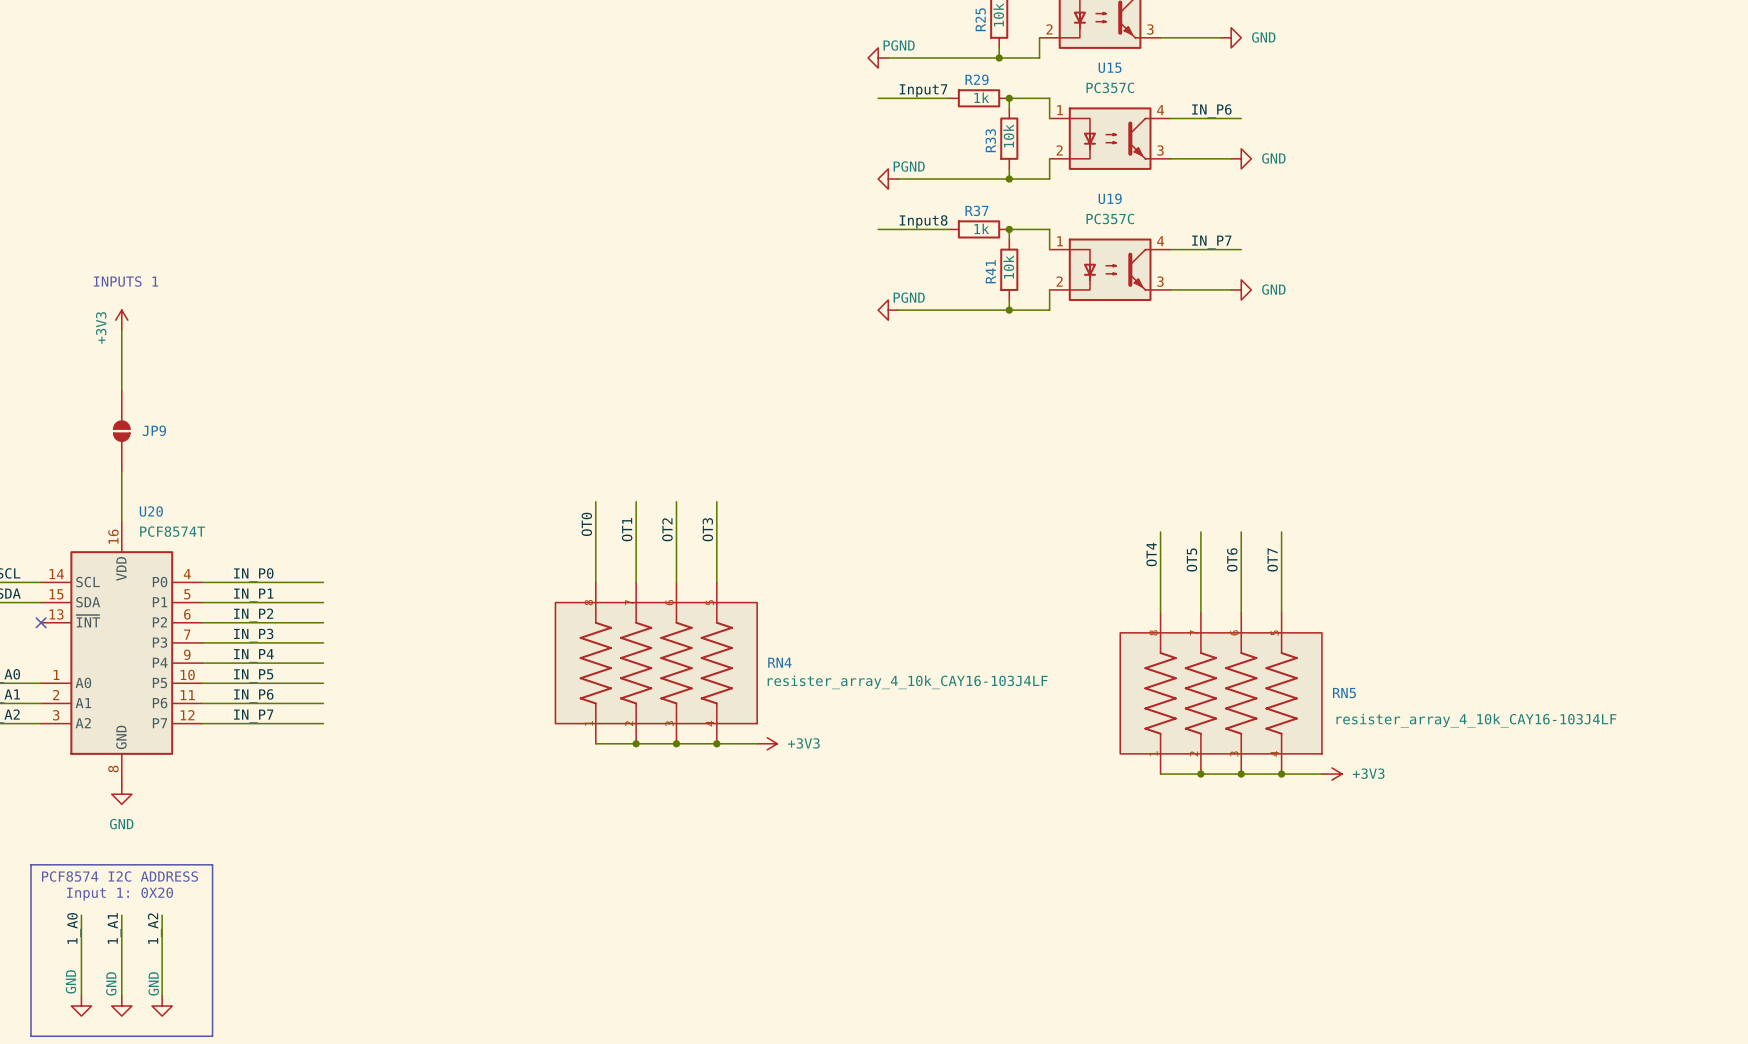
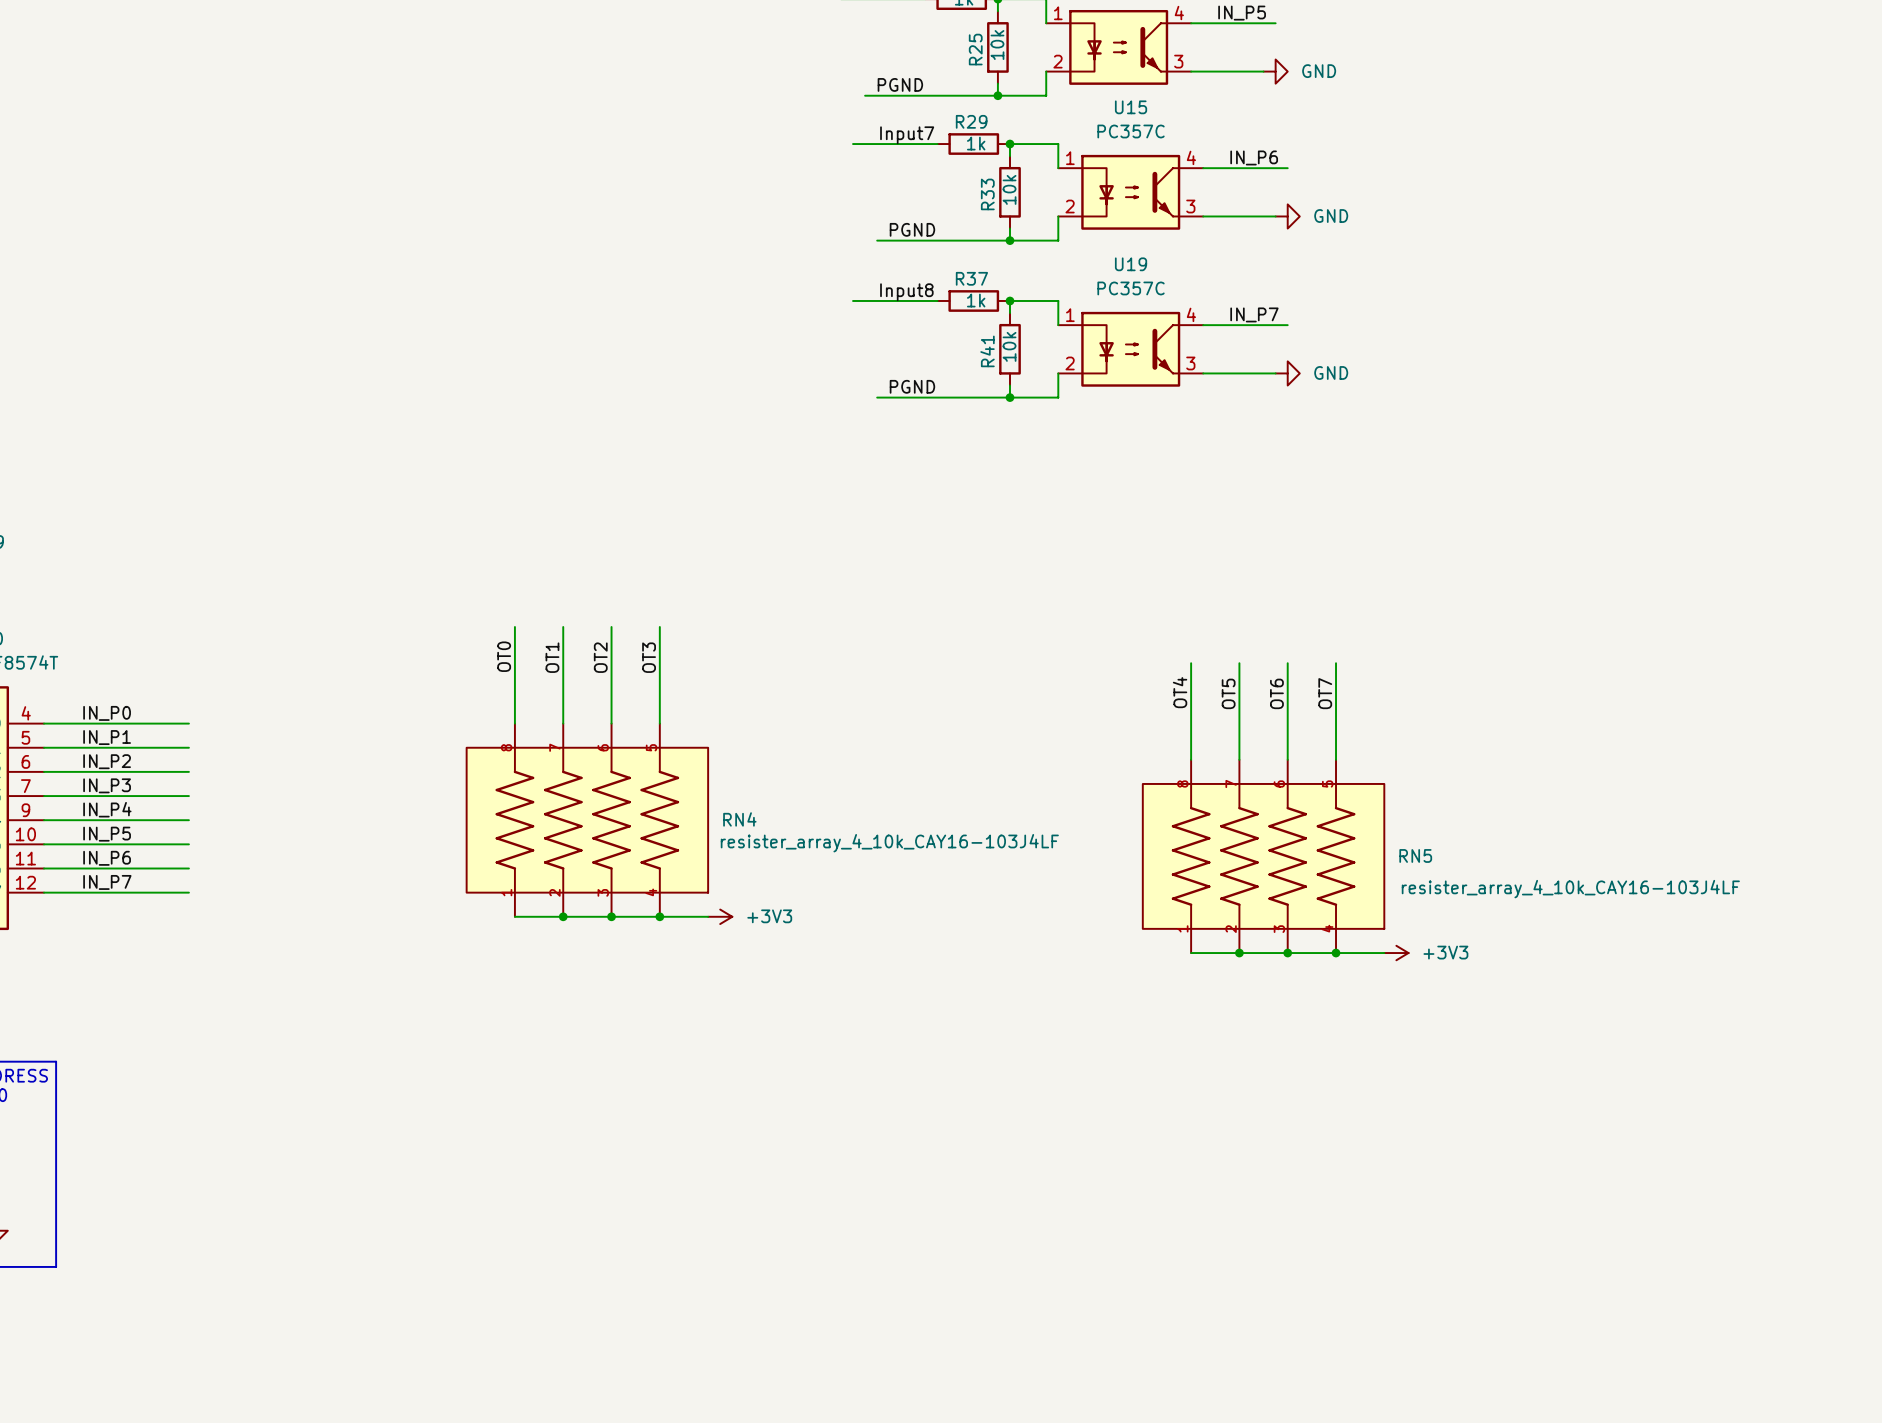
label: none -> PGND (900, 84)
power symbol: PGND (878, 57) -> none
label: none -> PGND (912, 229)
power symbol: PGND (888, 179) -> none
label: none -> PGND (912, 386)
power symbol: PGND (888, 310) -> none

